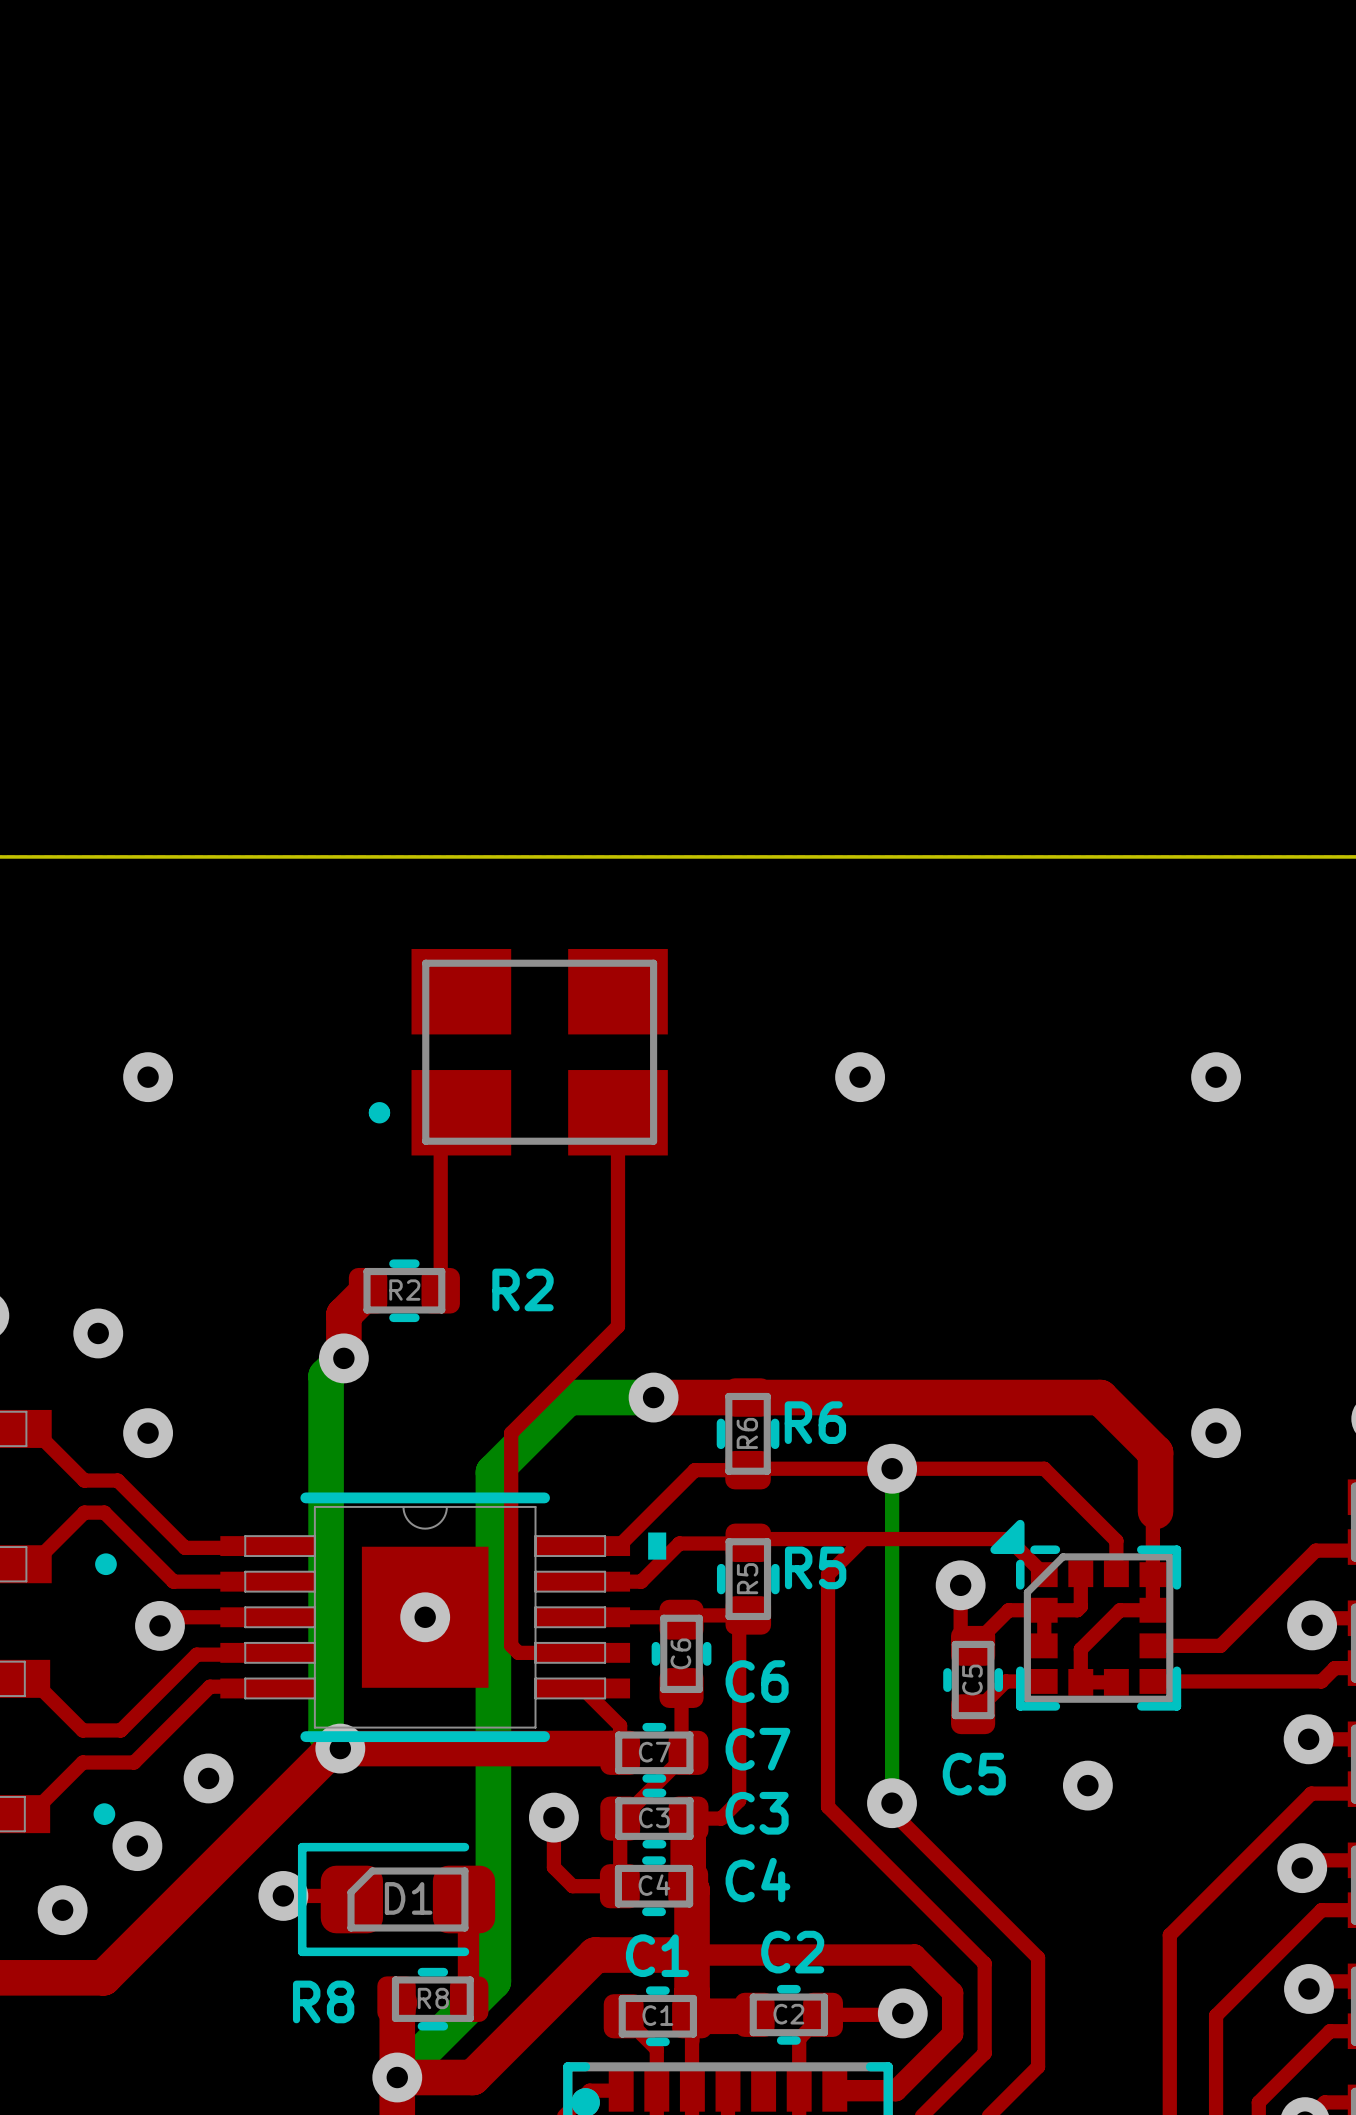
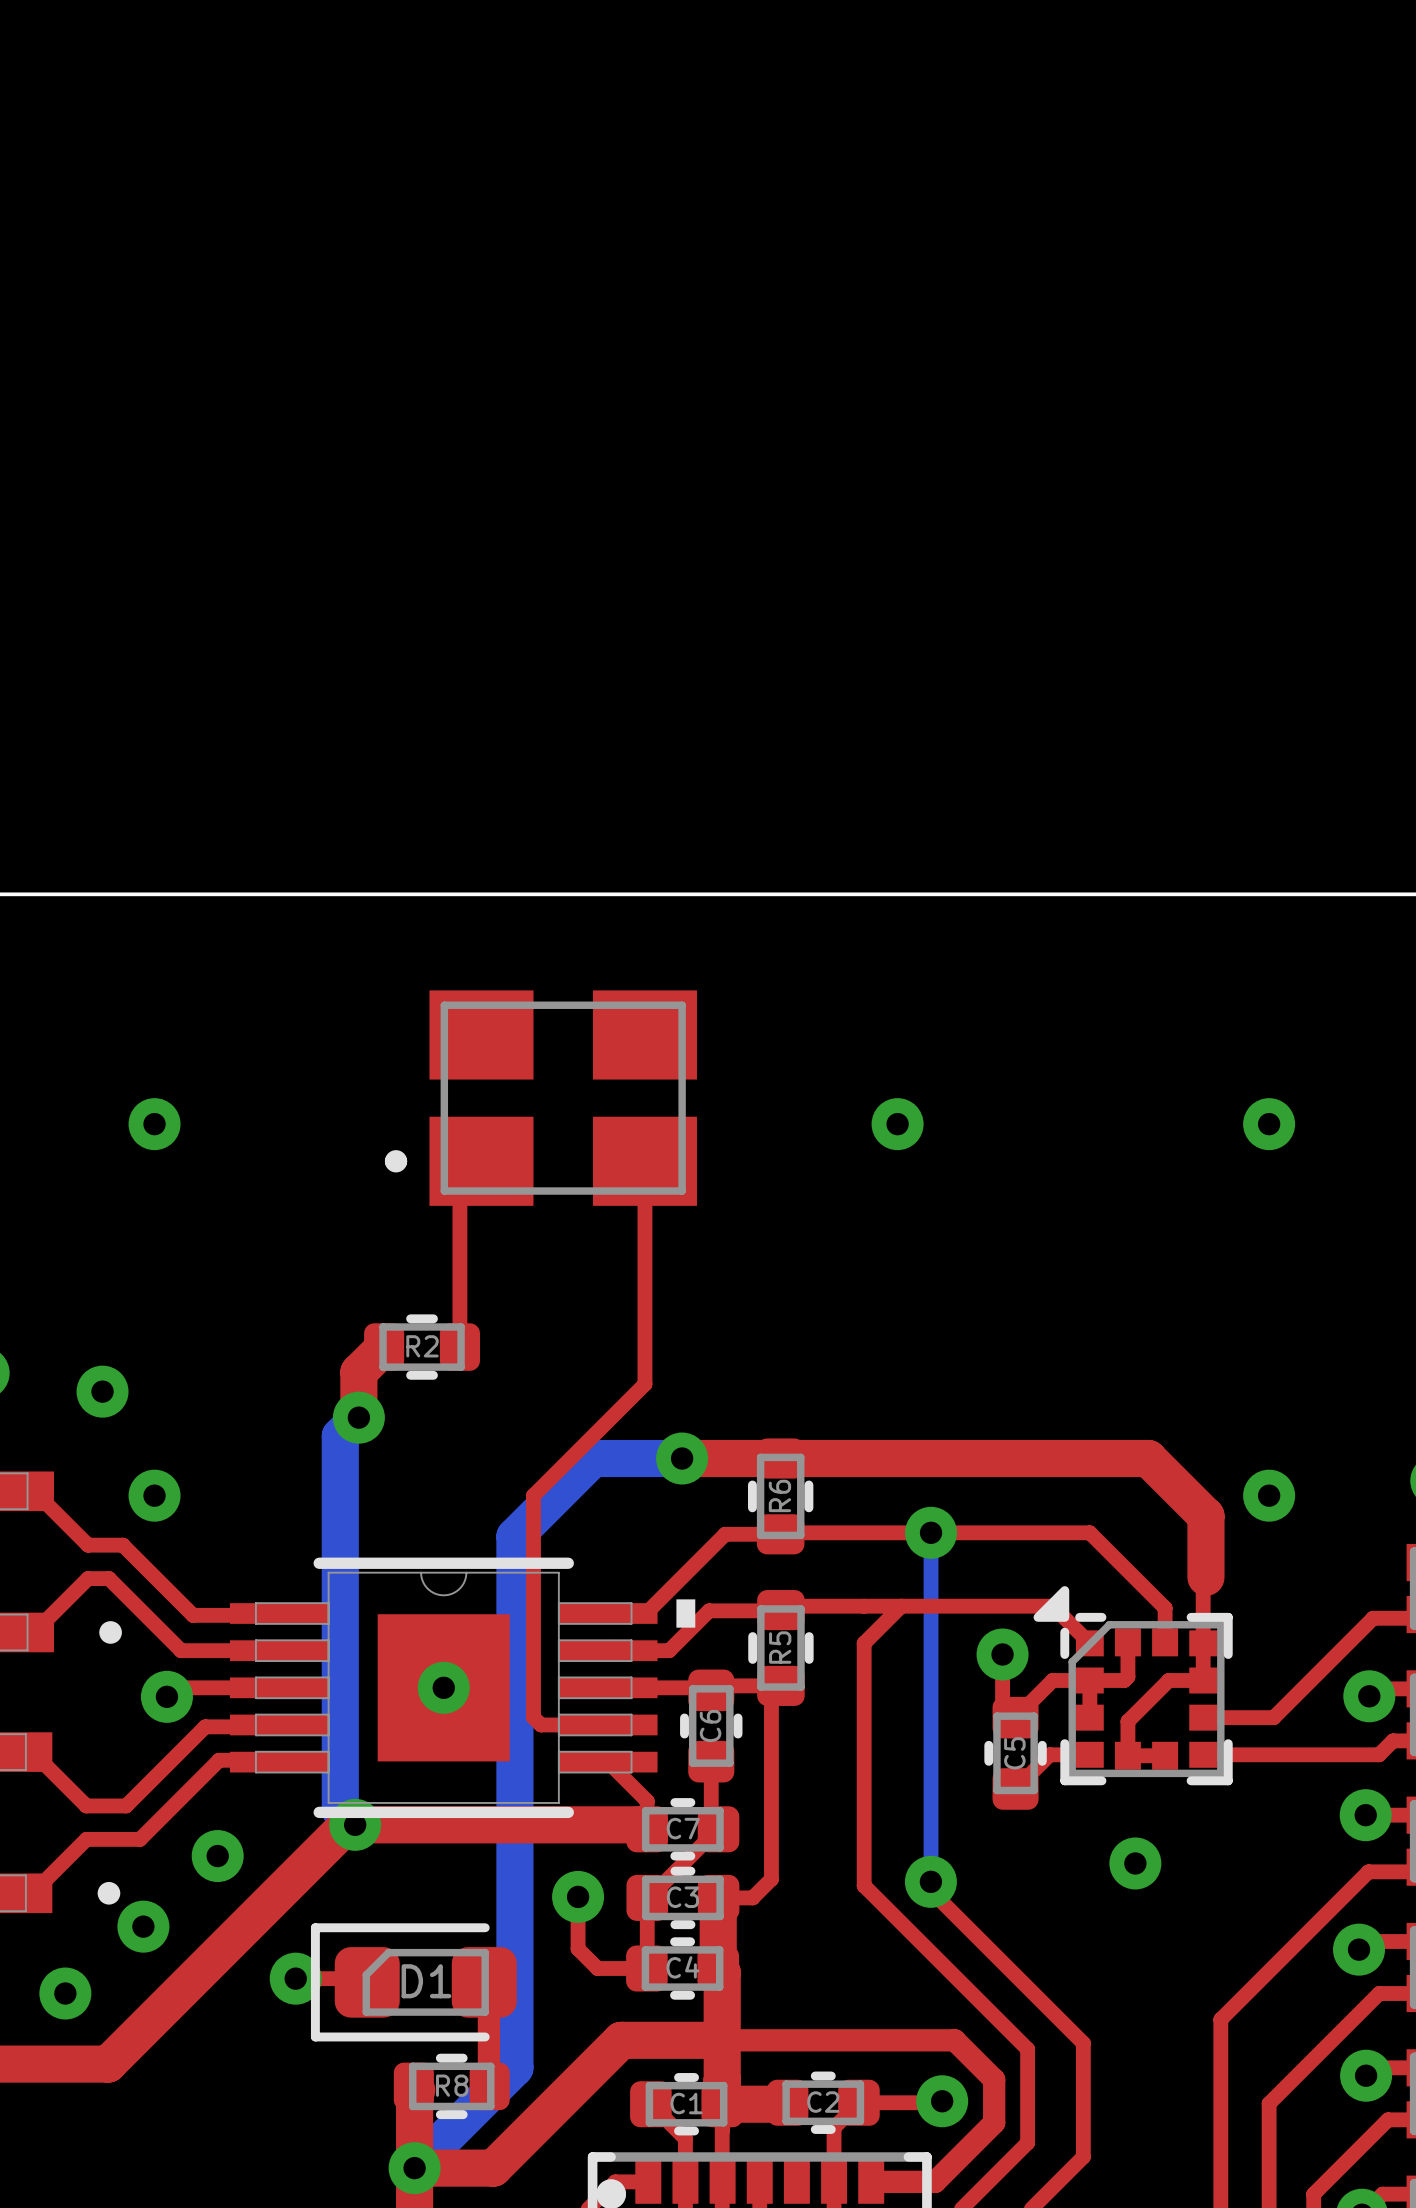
text: R2 (523, 1289) -> none
text: R6 (815, 1422) -> none
text: R5 (815, 1567) -> none
text: C6 (757, 1681) -> none
text: C7 (757, 1749) -> none
text: C5 (974, 1774) -> none
text: C3 (757, 1813) -> none
text: C4 (757, 1880) -> none
text: C2 (792, 1952) -> none
text: C1 (657, 1955) -> none
text: R8 (323, 2001) -> none

